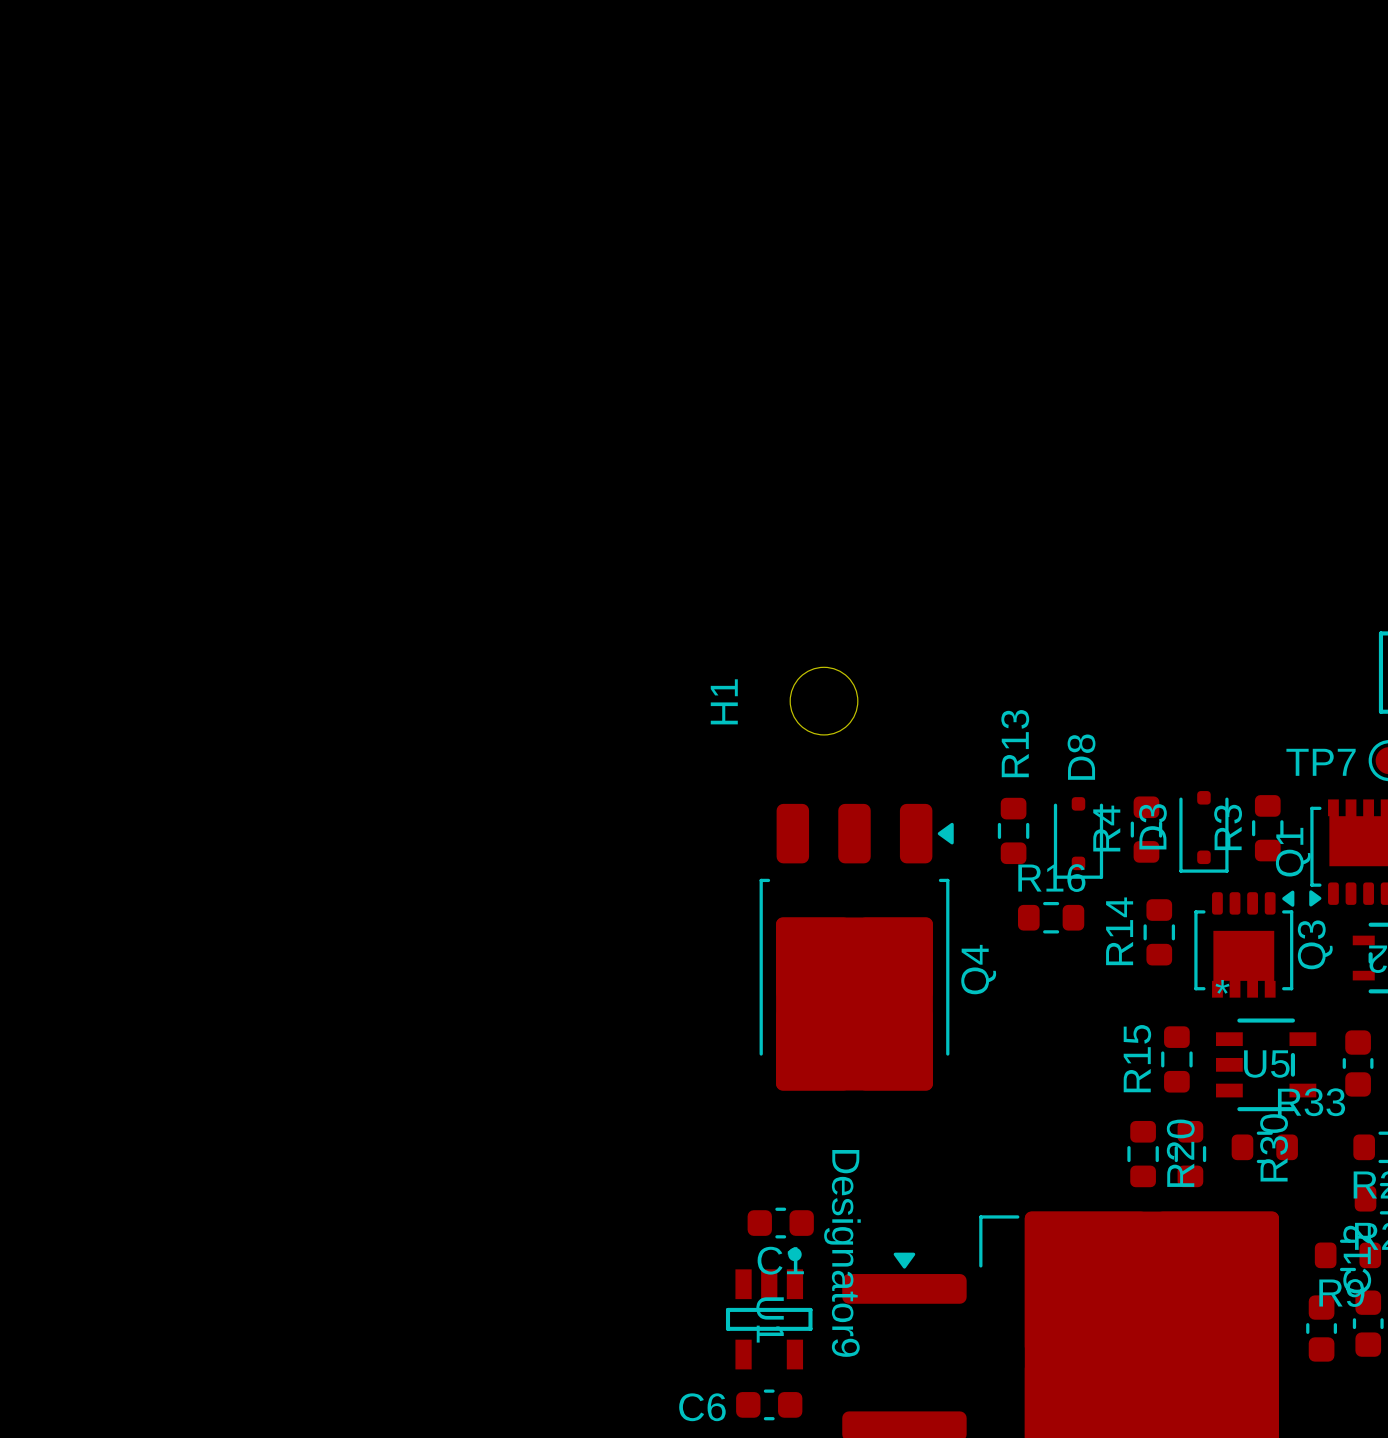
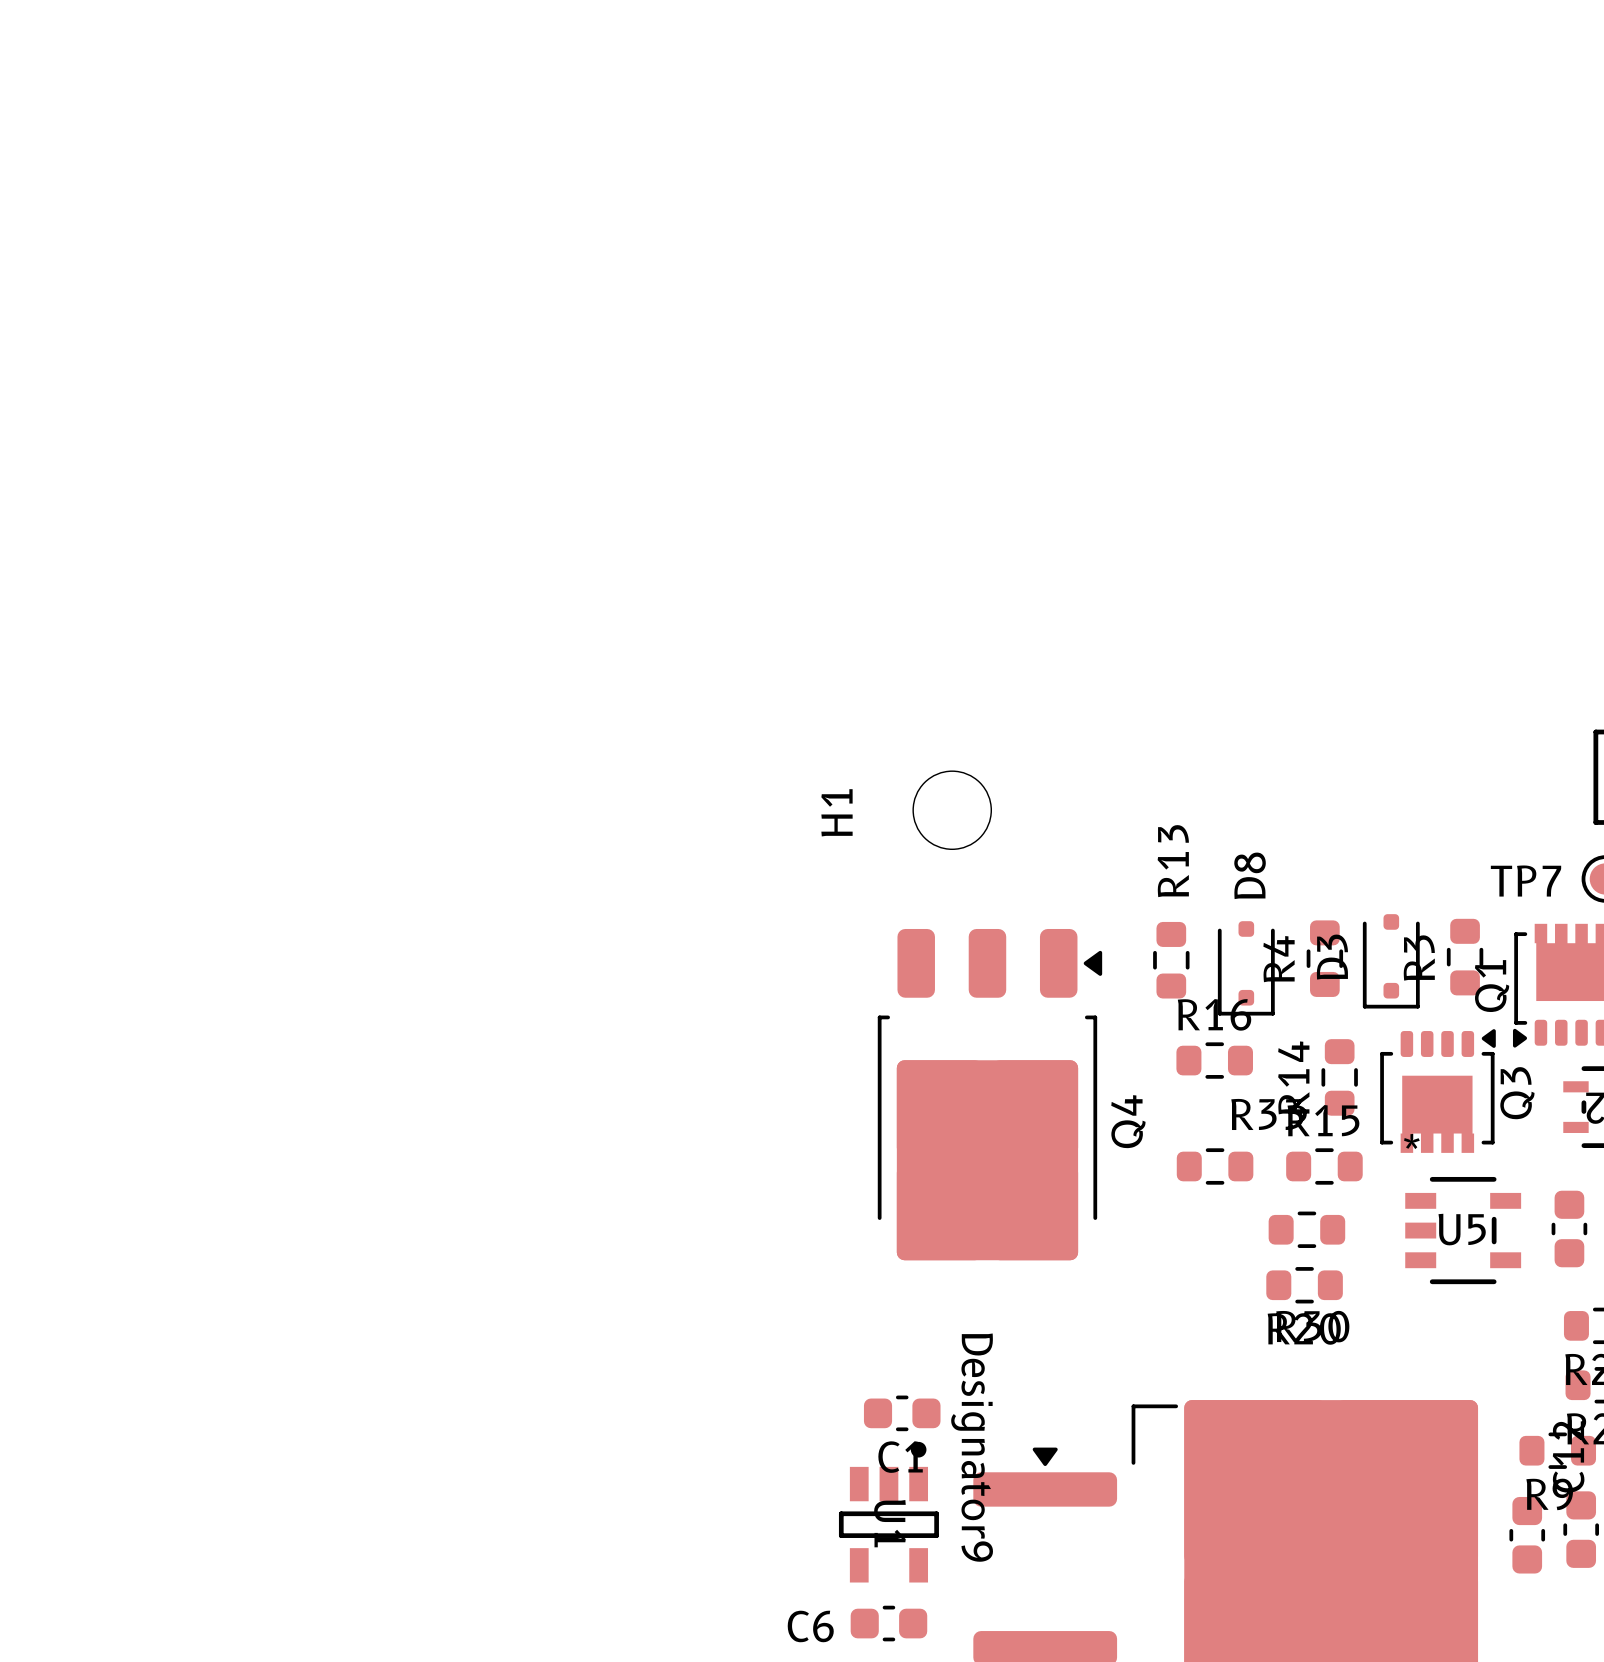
R15 rotation: 0° (1176, 1059) -> 90° clockwise (1324, 1166)
R15 position: (1176, 1059) -> (1324, 1166)
R33 position: (1264, 1147) -> (1215, 1166)
R20 rotation: 0° (1143, 1154) -> 90° clockwise (1304, 1285)
R20 position: (1143, 1154) -> (1304, 1285)
R30 rotation: 0° (1190, 1154) -> 90° clockwise (1306, 1229)
R30 position: (1190, 1154) -> (1306, 1229)

